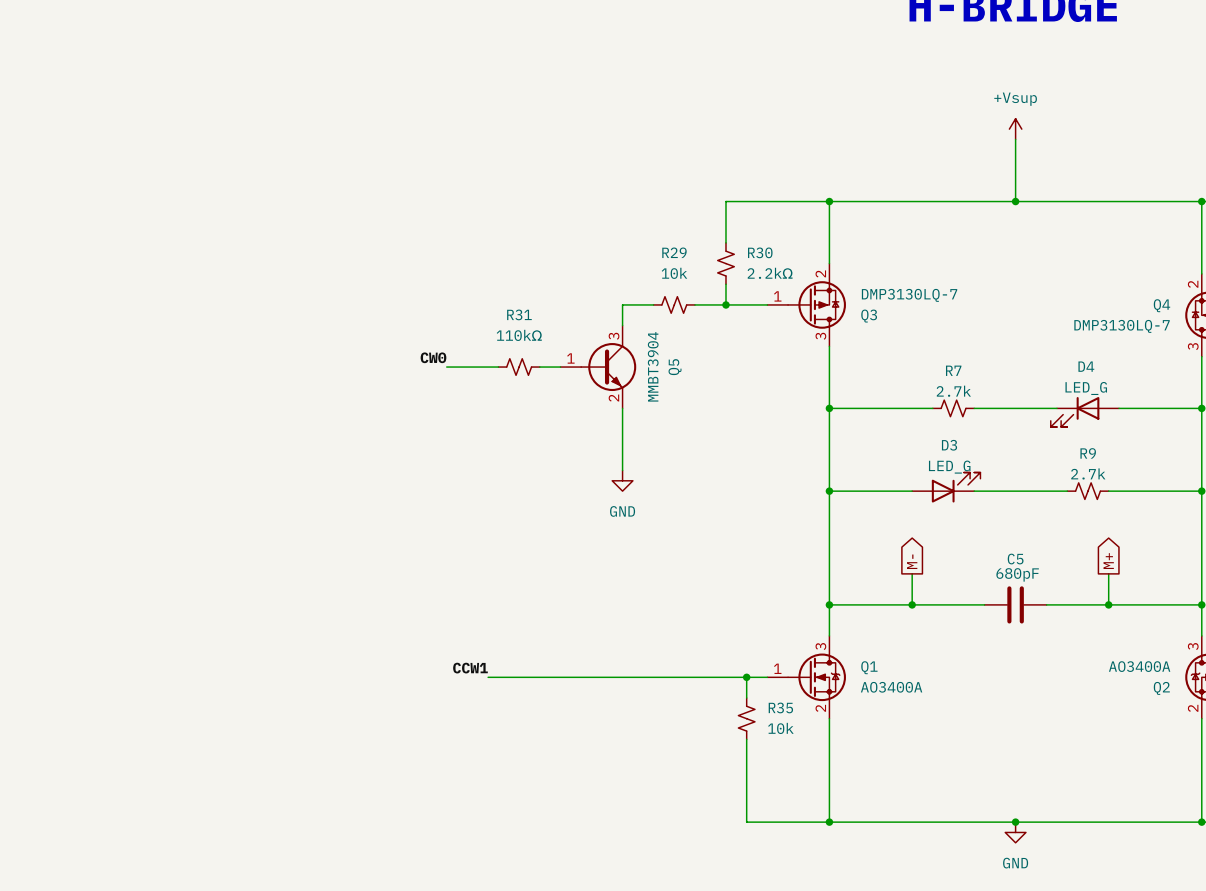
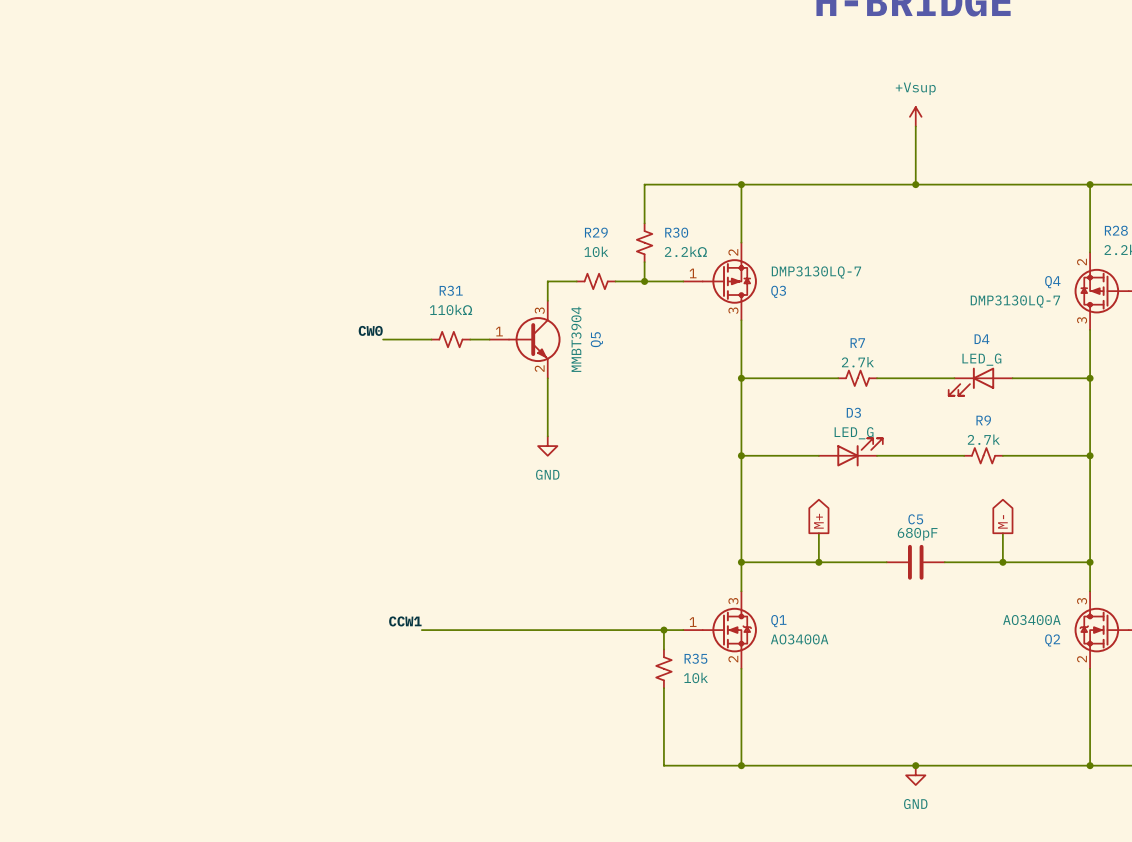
global label: M- (912, 561) -> M+ (818, 521)
global label: M+ (1108, 561) -> M- (1002, 521)

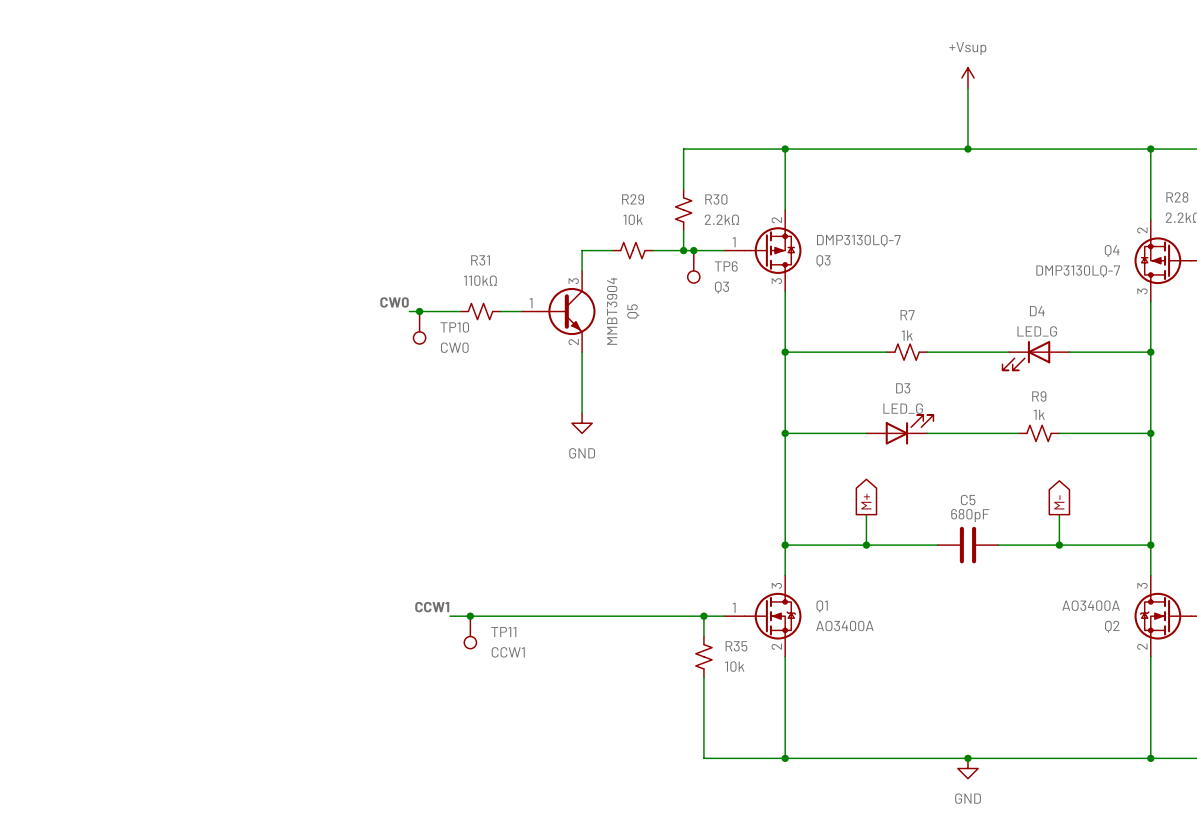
junction: none -> (693, 250)
TP6: none -> Q3 (693, 266)
junction: none -> (419, 311)
TP10: none -> CW0 (419, 327)
R7 value: 2.7k (857, 362) -> 1k (907, 335)
R9 value: 2.7k (983, 439) -> 1k (1039, 414)
junction: none -> (470, 616)
TP11: none -> CCW1 (470, 632)

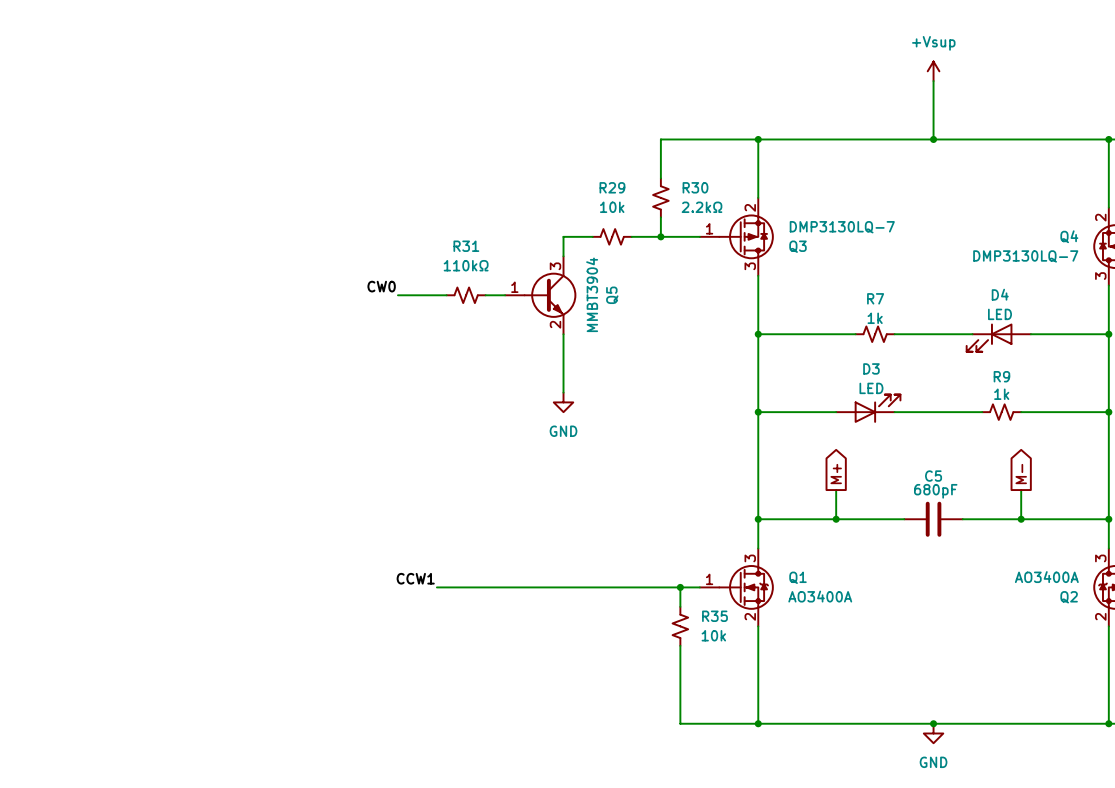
junction: (693, 250) -> none
TP6: Q3 (693, 266) -> none
junction: (419, 311) -> none
TP10: CW0 (419, 327) -> none
D4 value: LED_G (1037, 331) -> LED (1000, 314)
D3 value: LED_G (903, 408) -> LED (871, 388)
junction: (470, 616) -> none
TP11: CCW1 (470, 632) -> none

